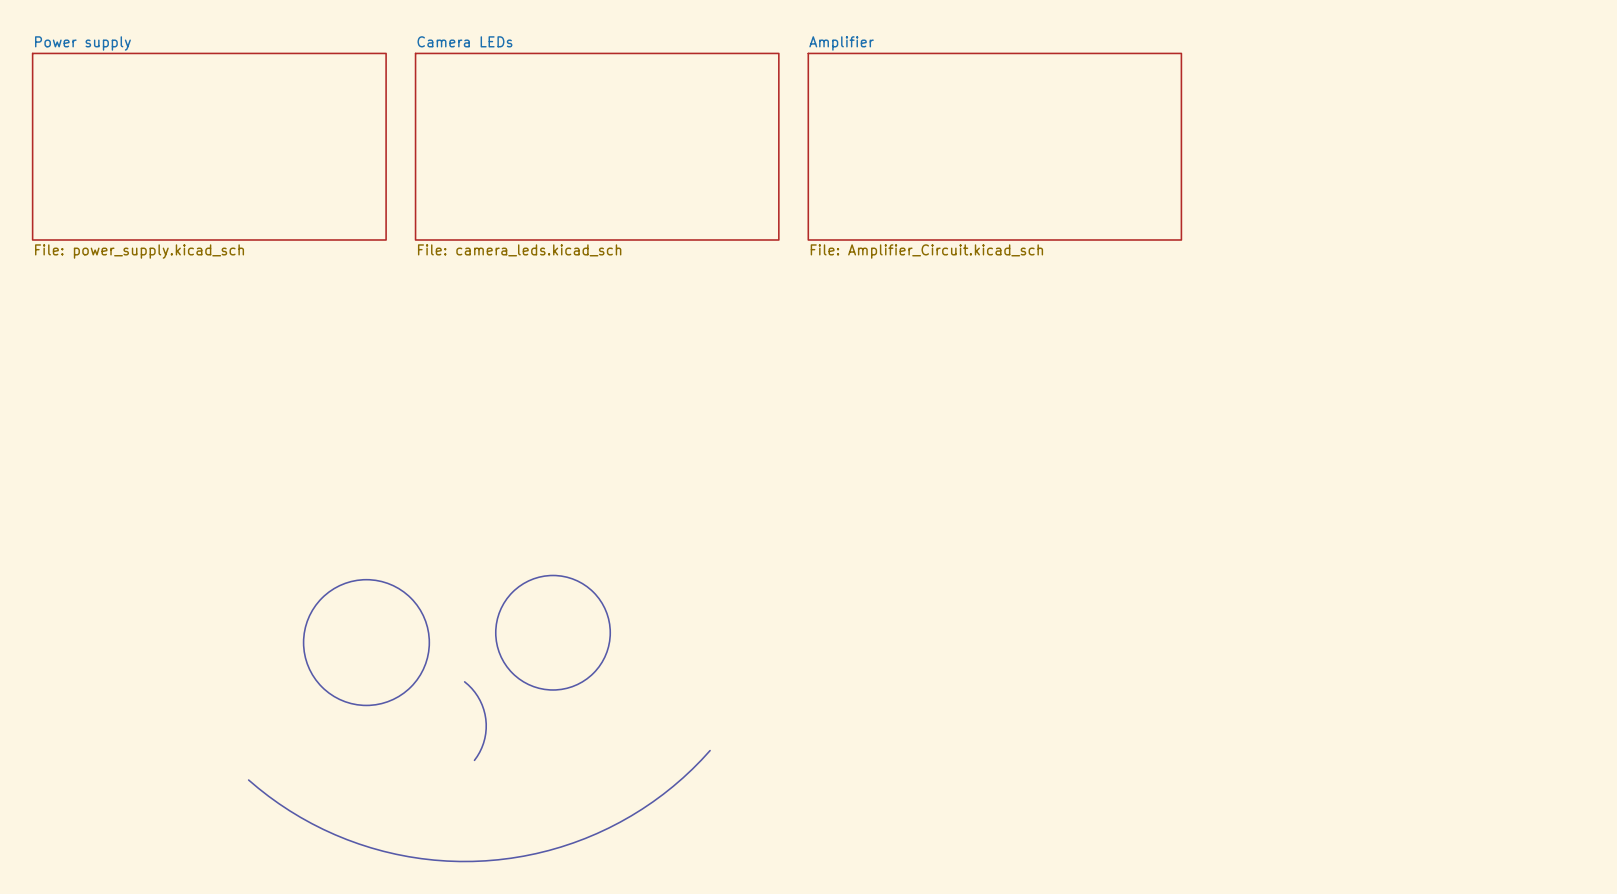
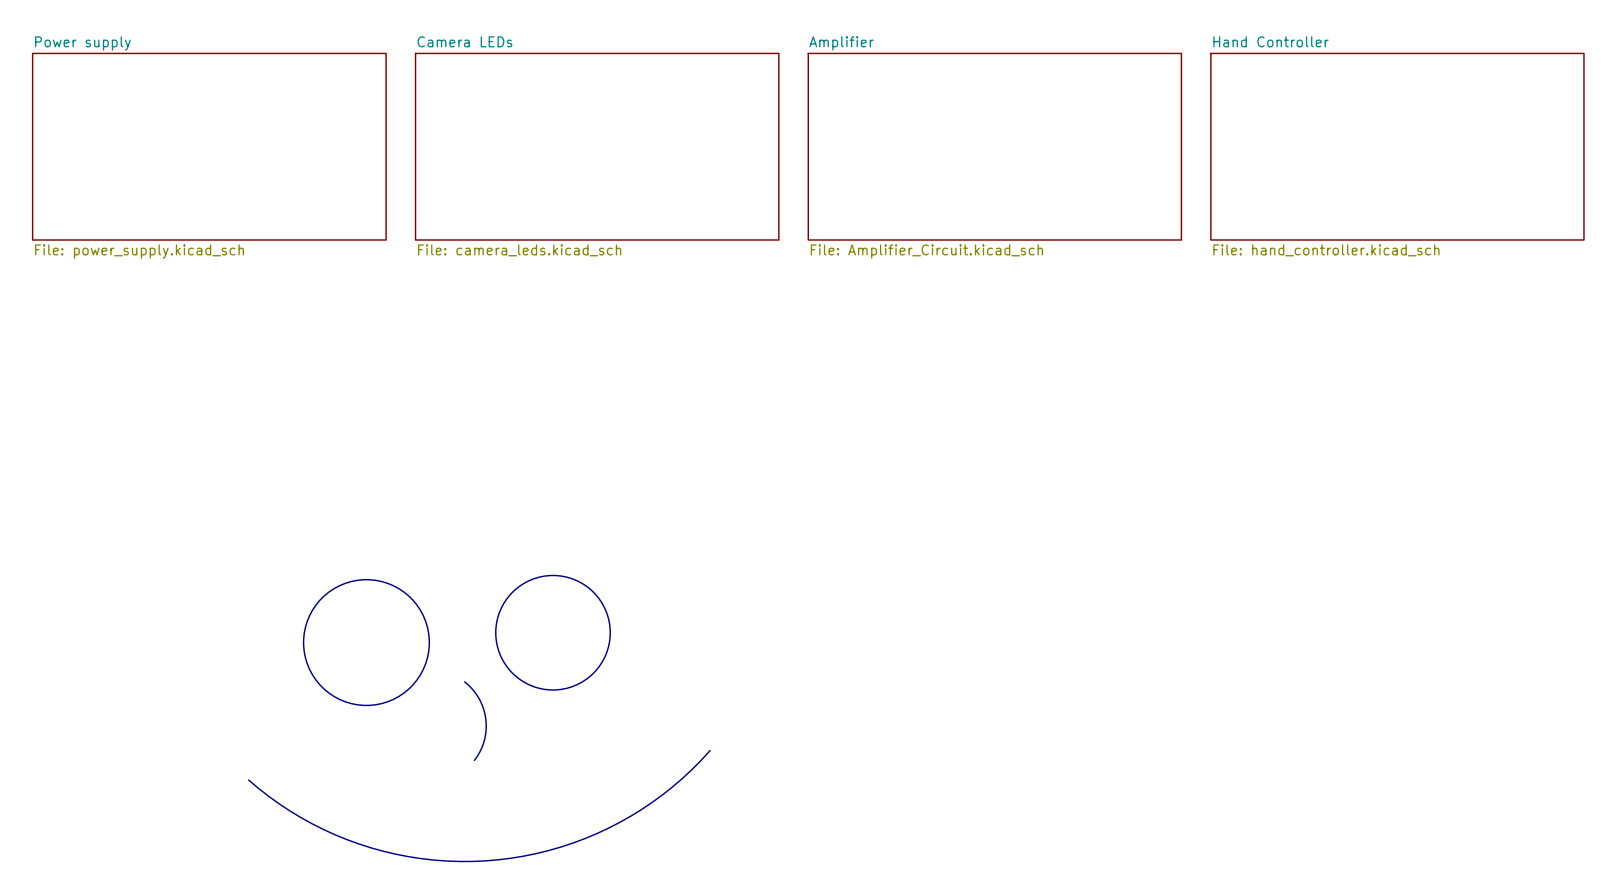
sheet Hand Controller: none -> File: hand_controller.kicad_sch (1397, 146)

